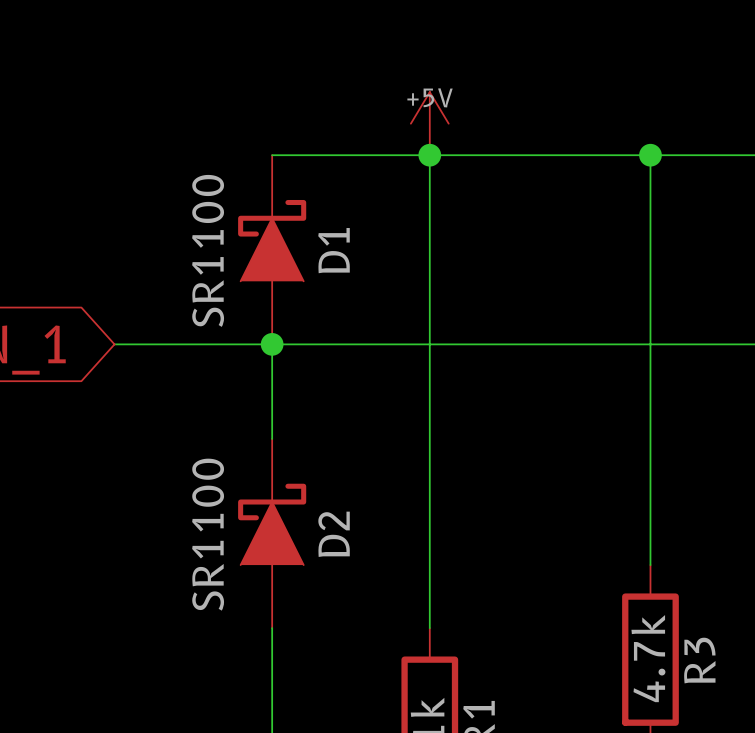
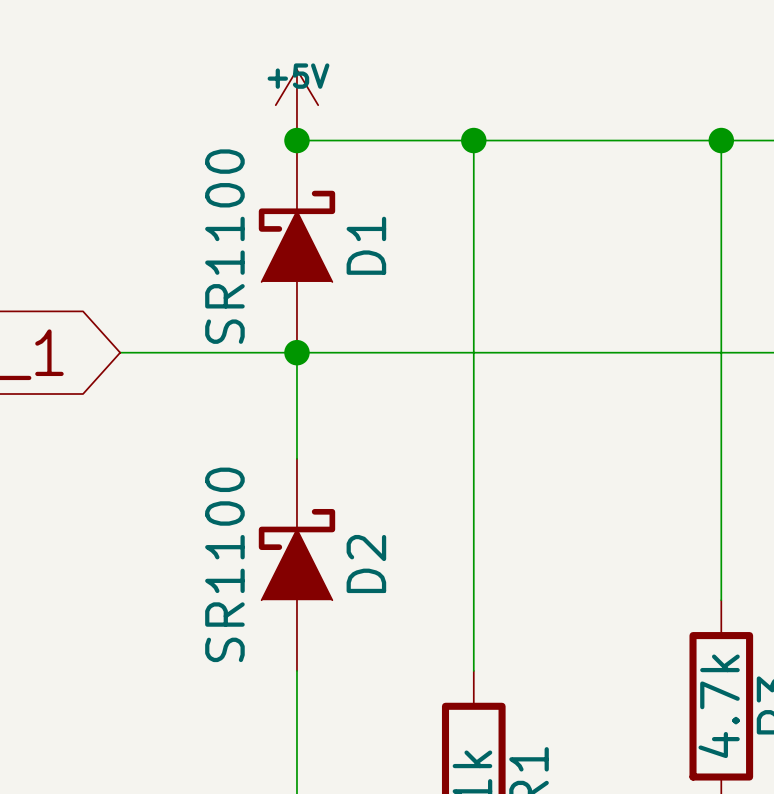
power symbol position: +5V (429, 123) -> +5V (296, 105)
junction: none -> (296, 140)

